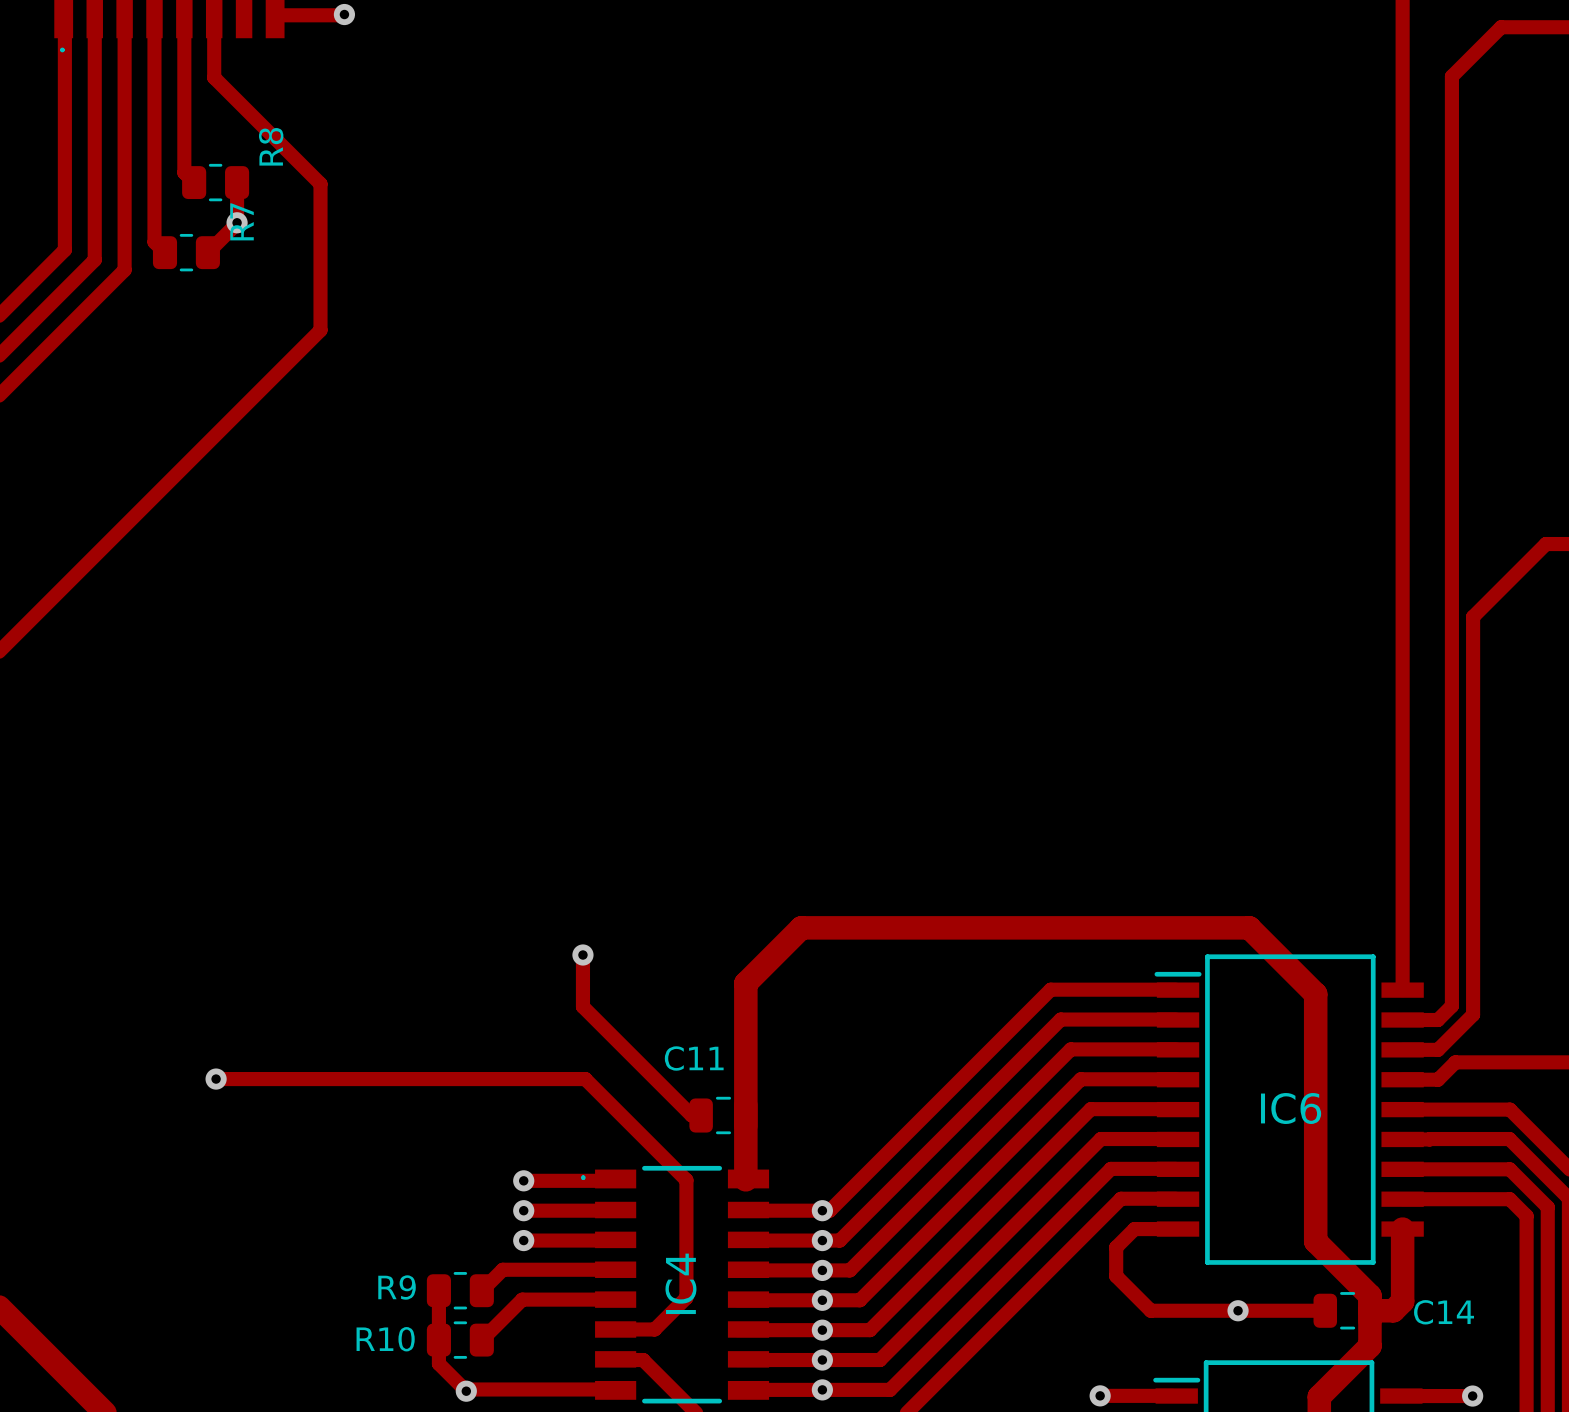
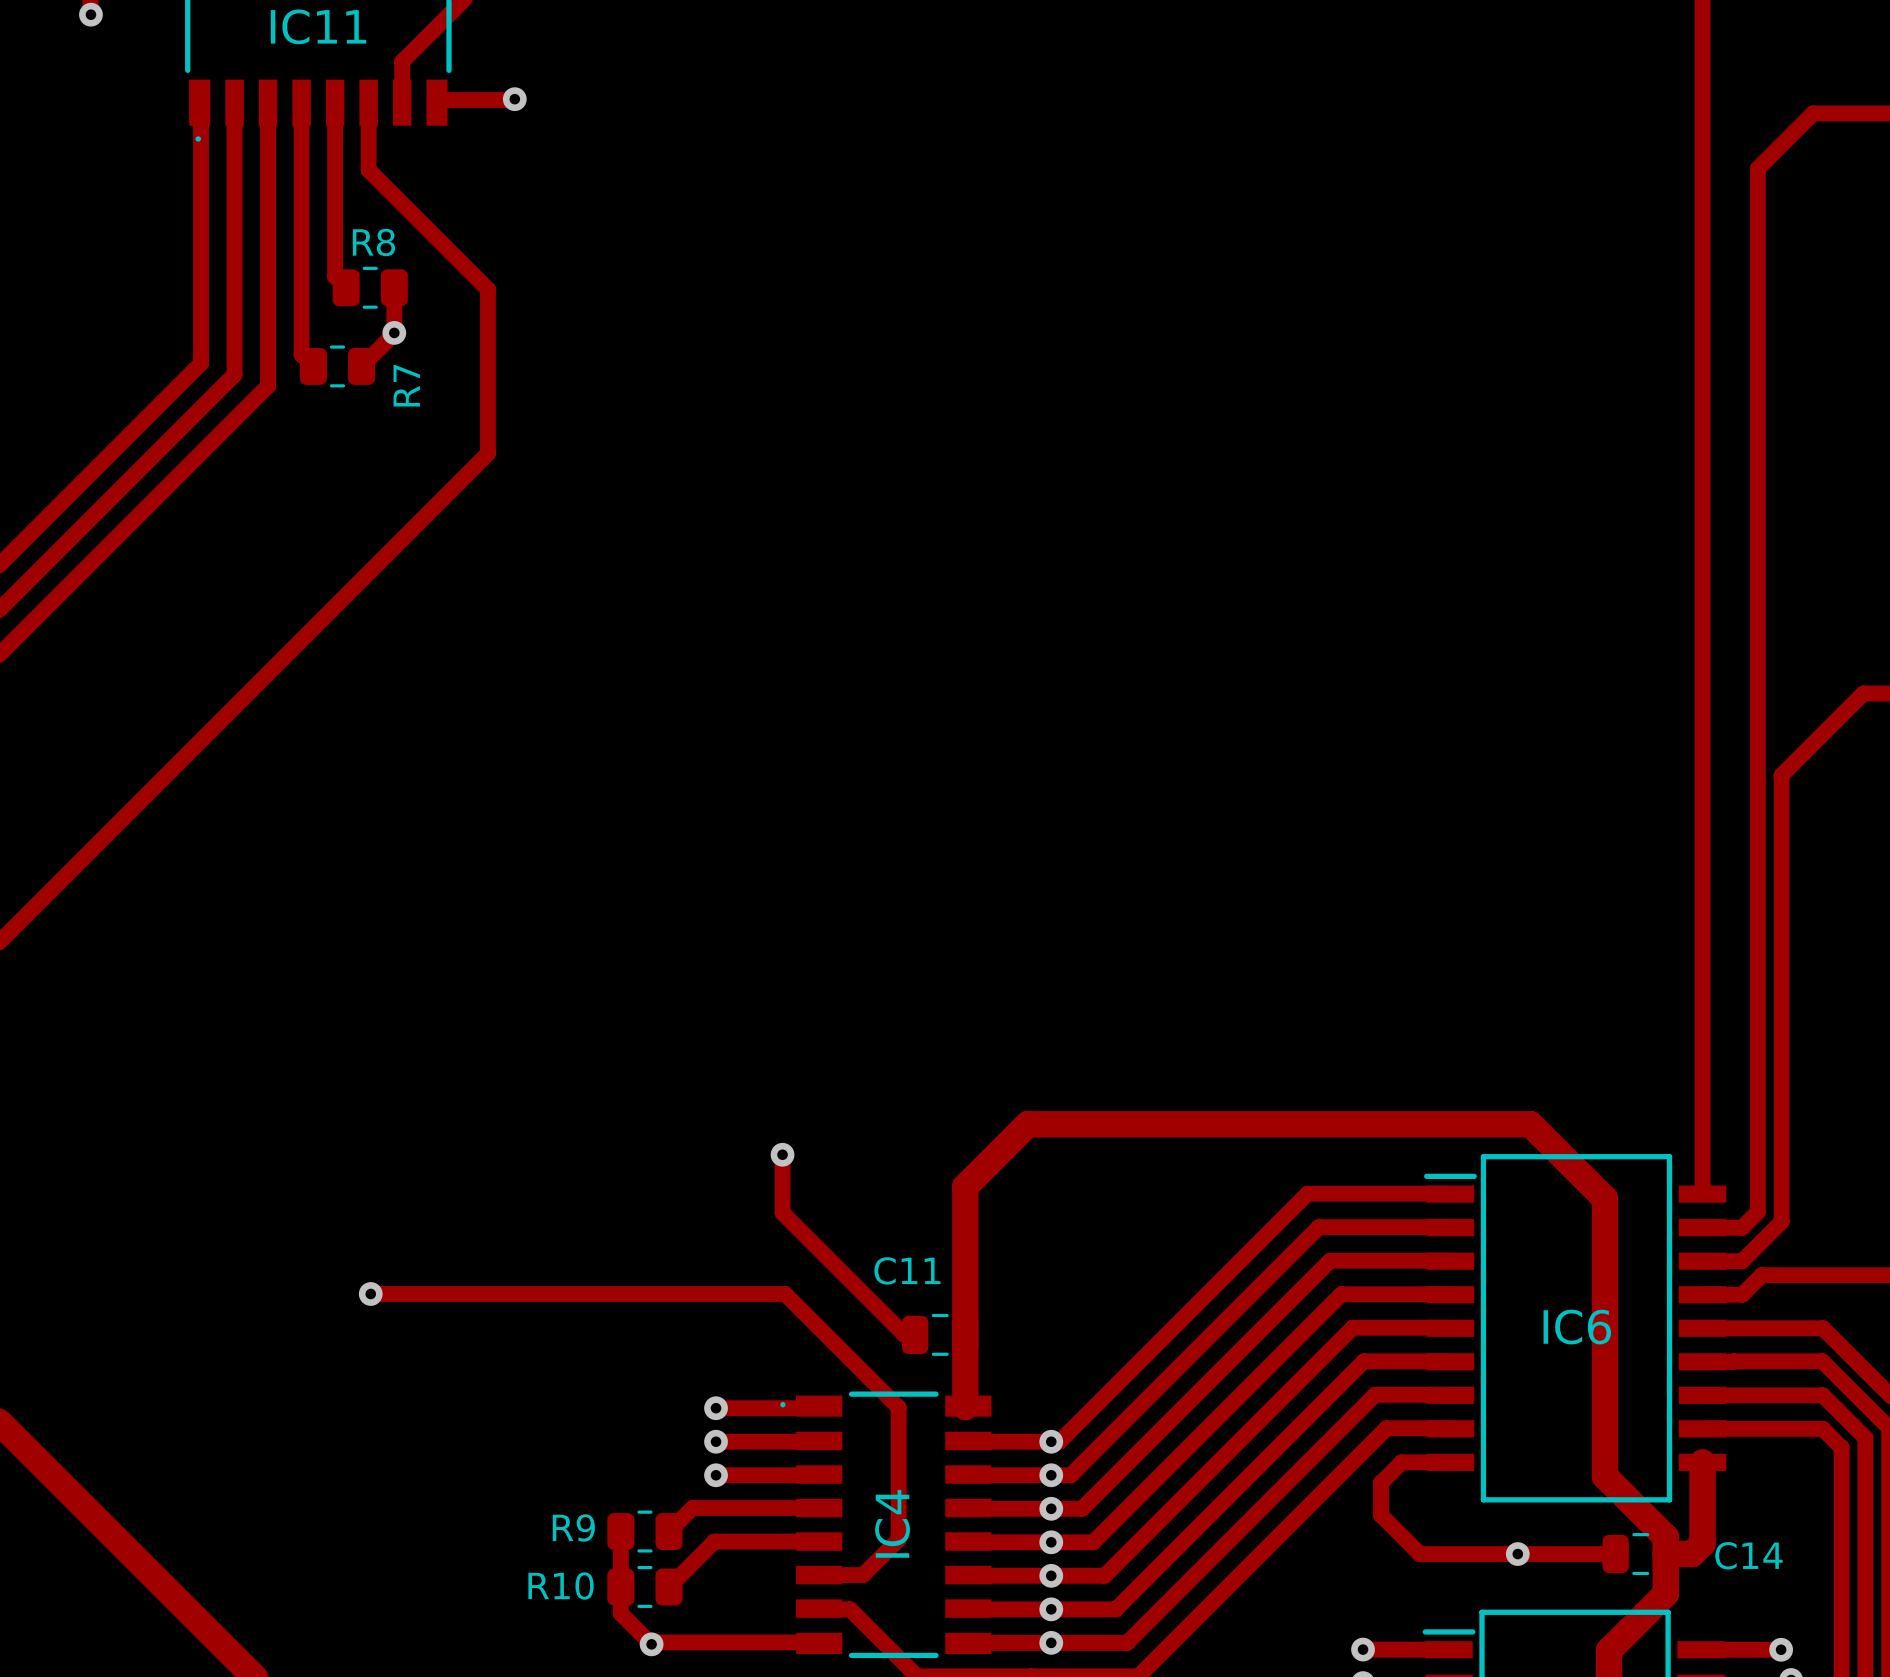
R8 name rotation: 0° (271, 146) -> 90° clockwise (373, 242)
R7 name position: R7 (242, 221) -> R7 (406, 385)

